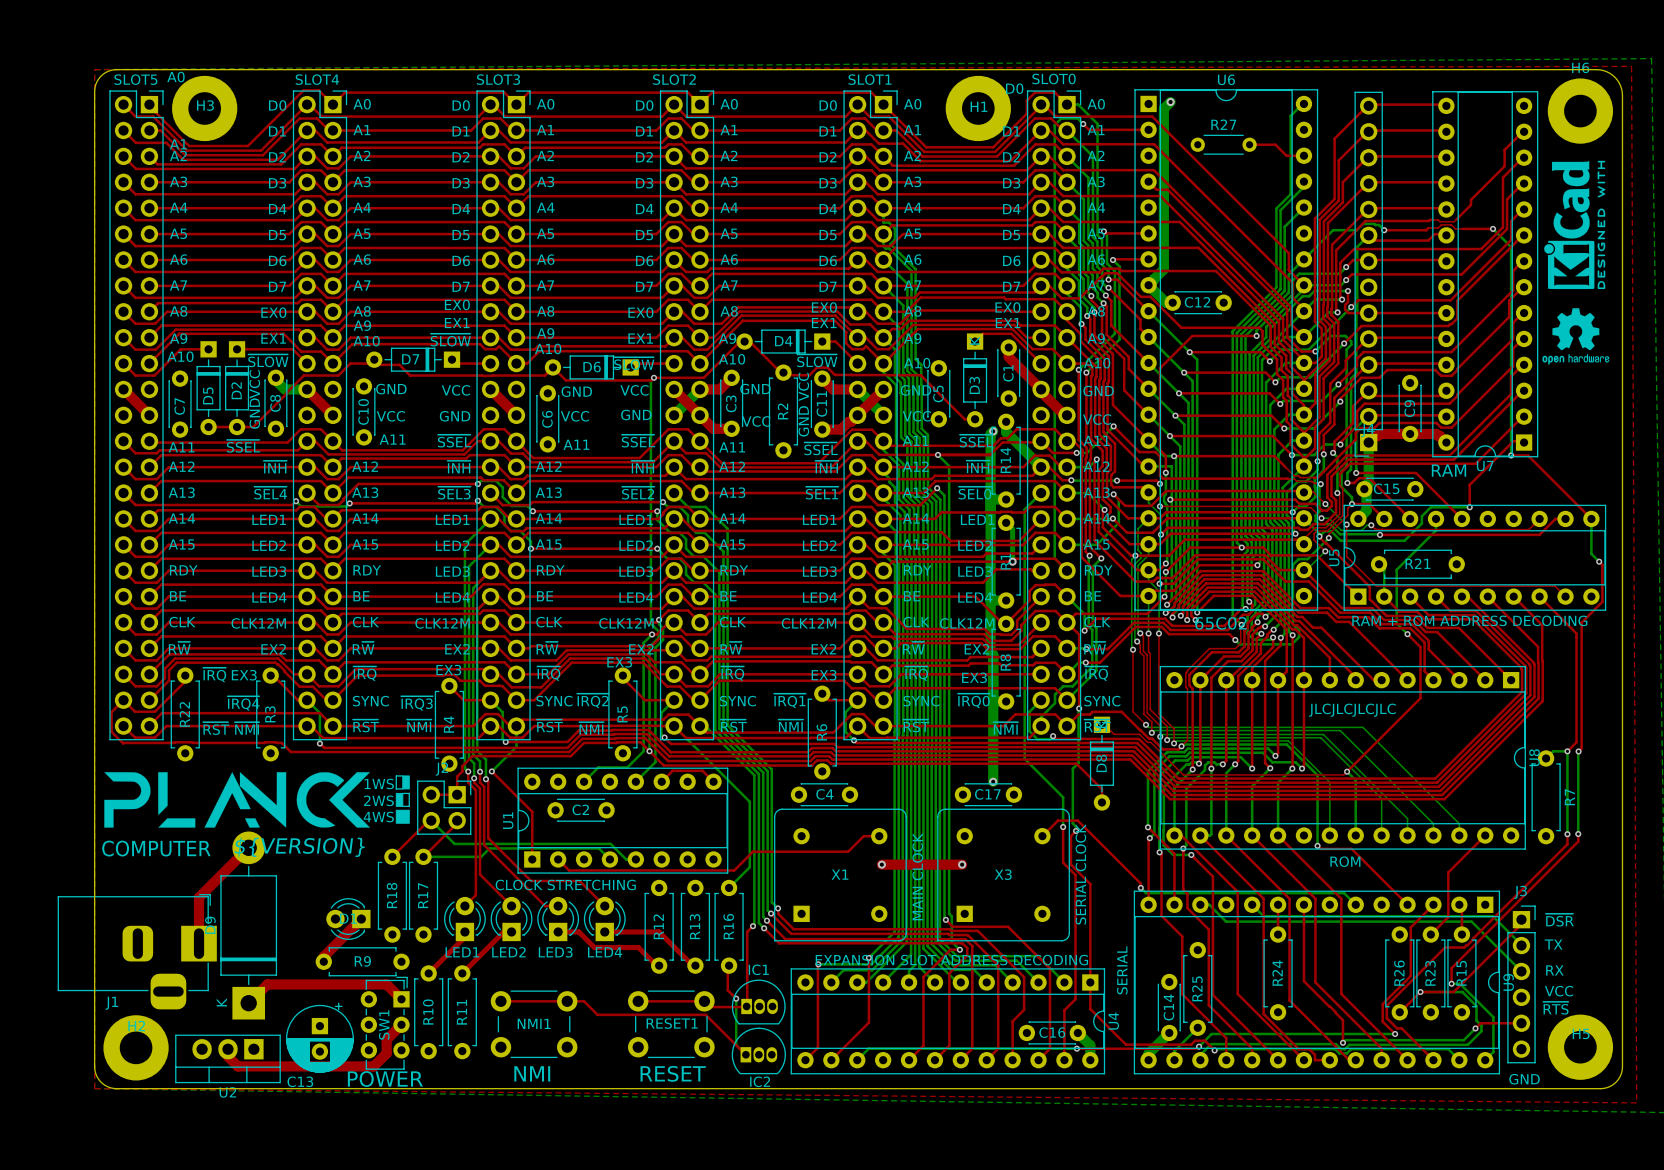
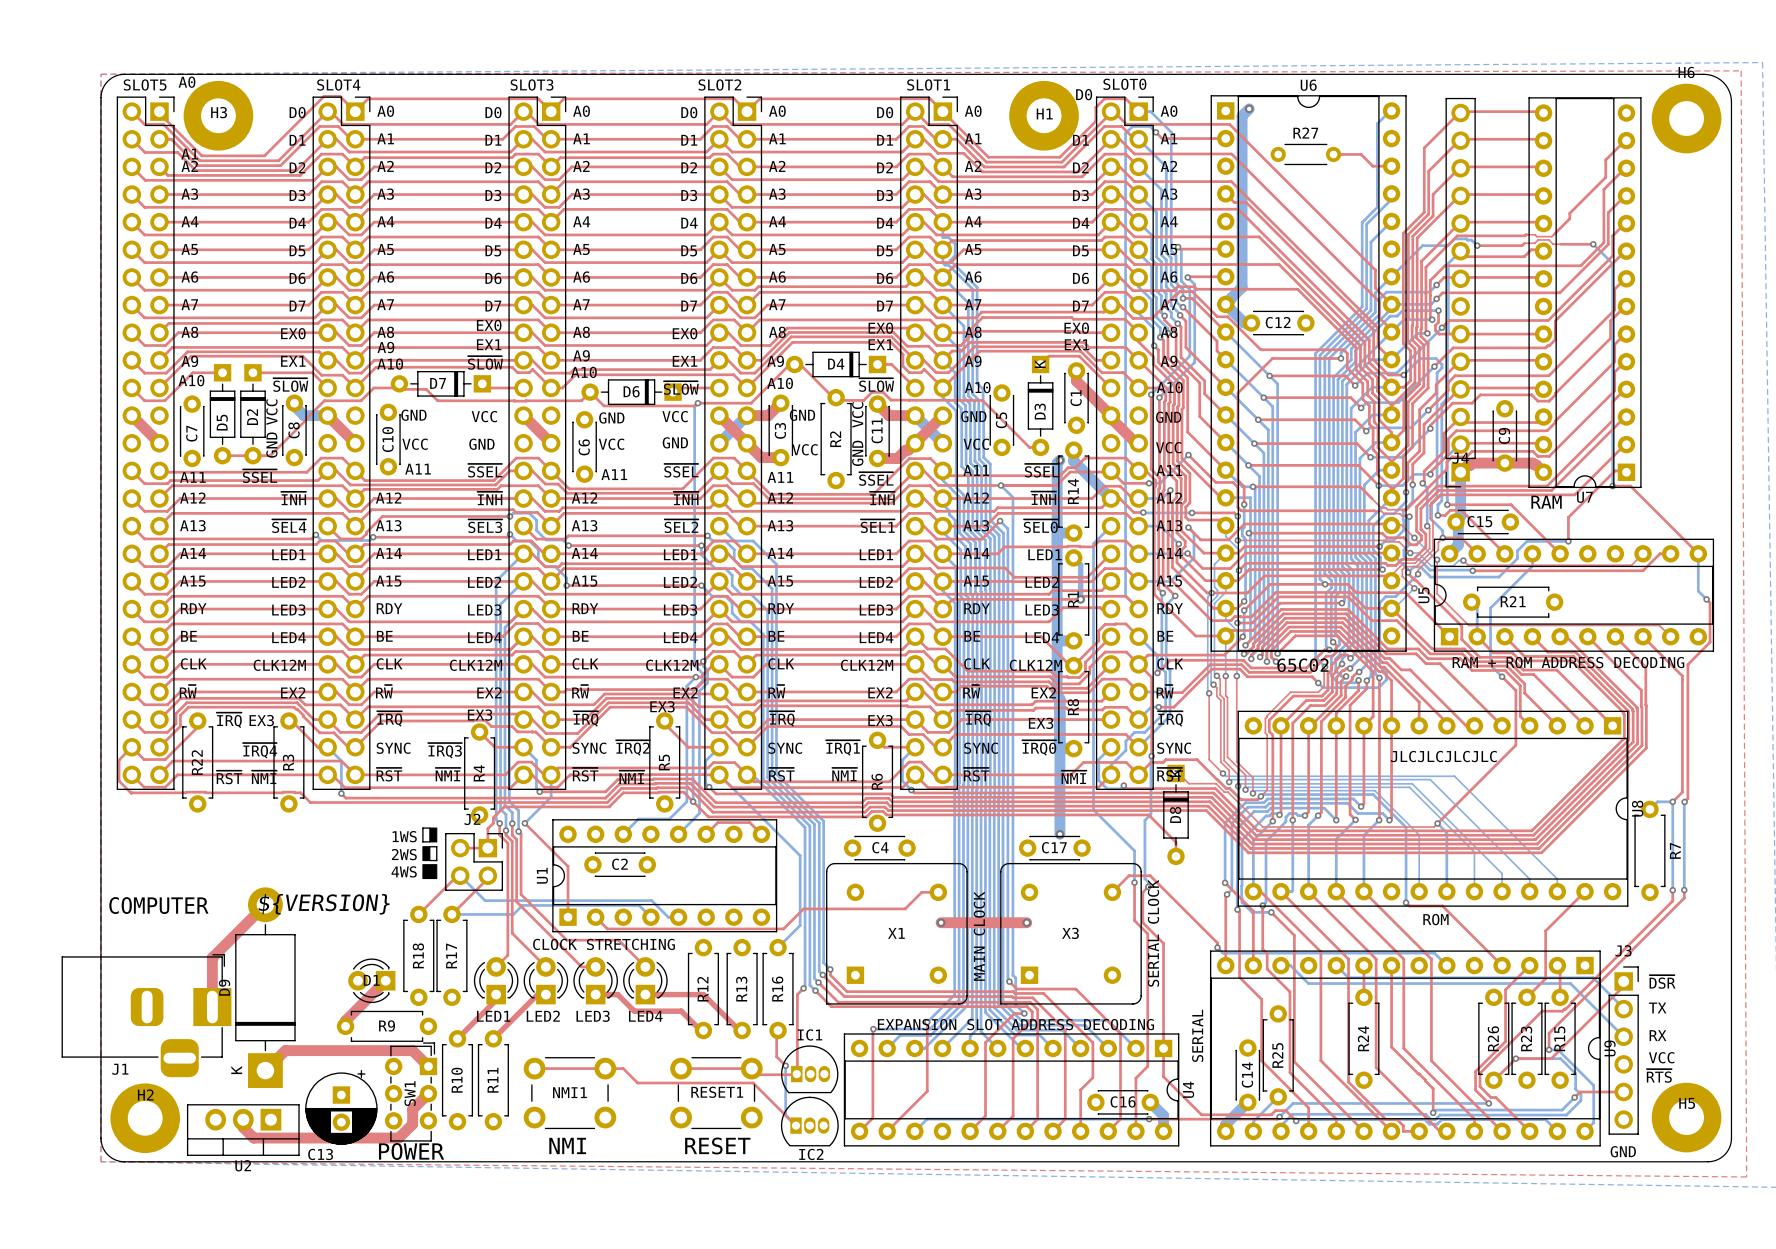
drawing: [1544, 160, 1606, 290] -> none
drawing: [1542, 308, 1610, 365] -> none
drawing: [104, 772, 371, 828] -> none

